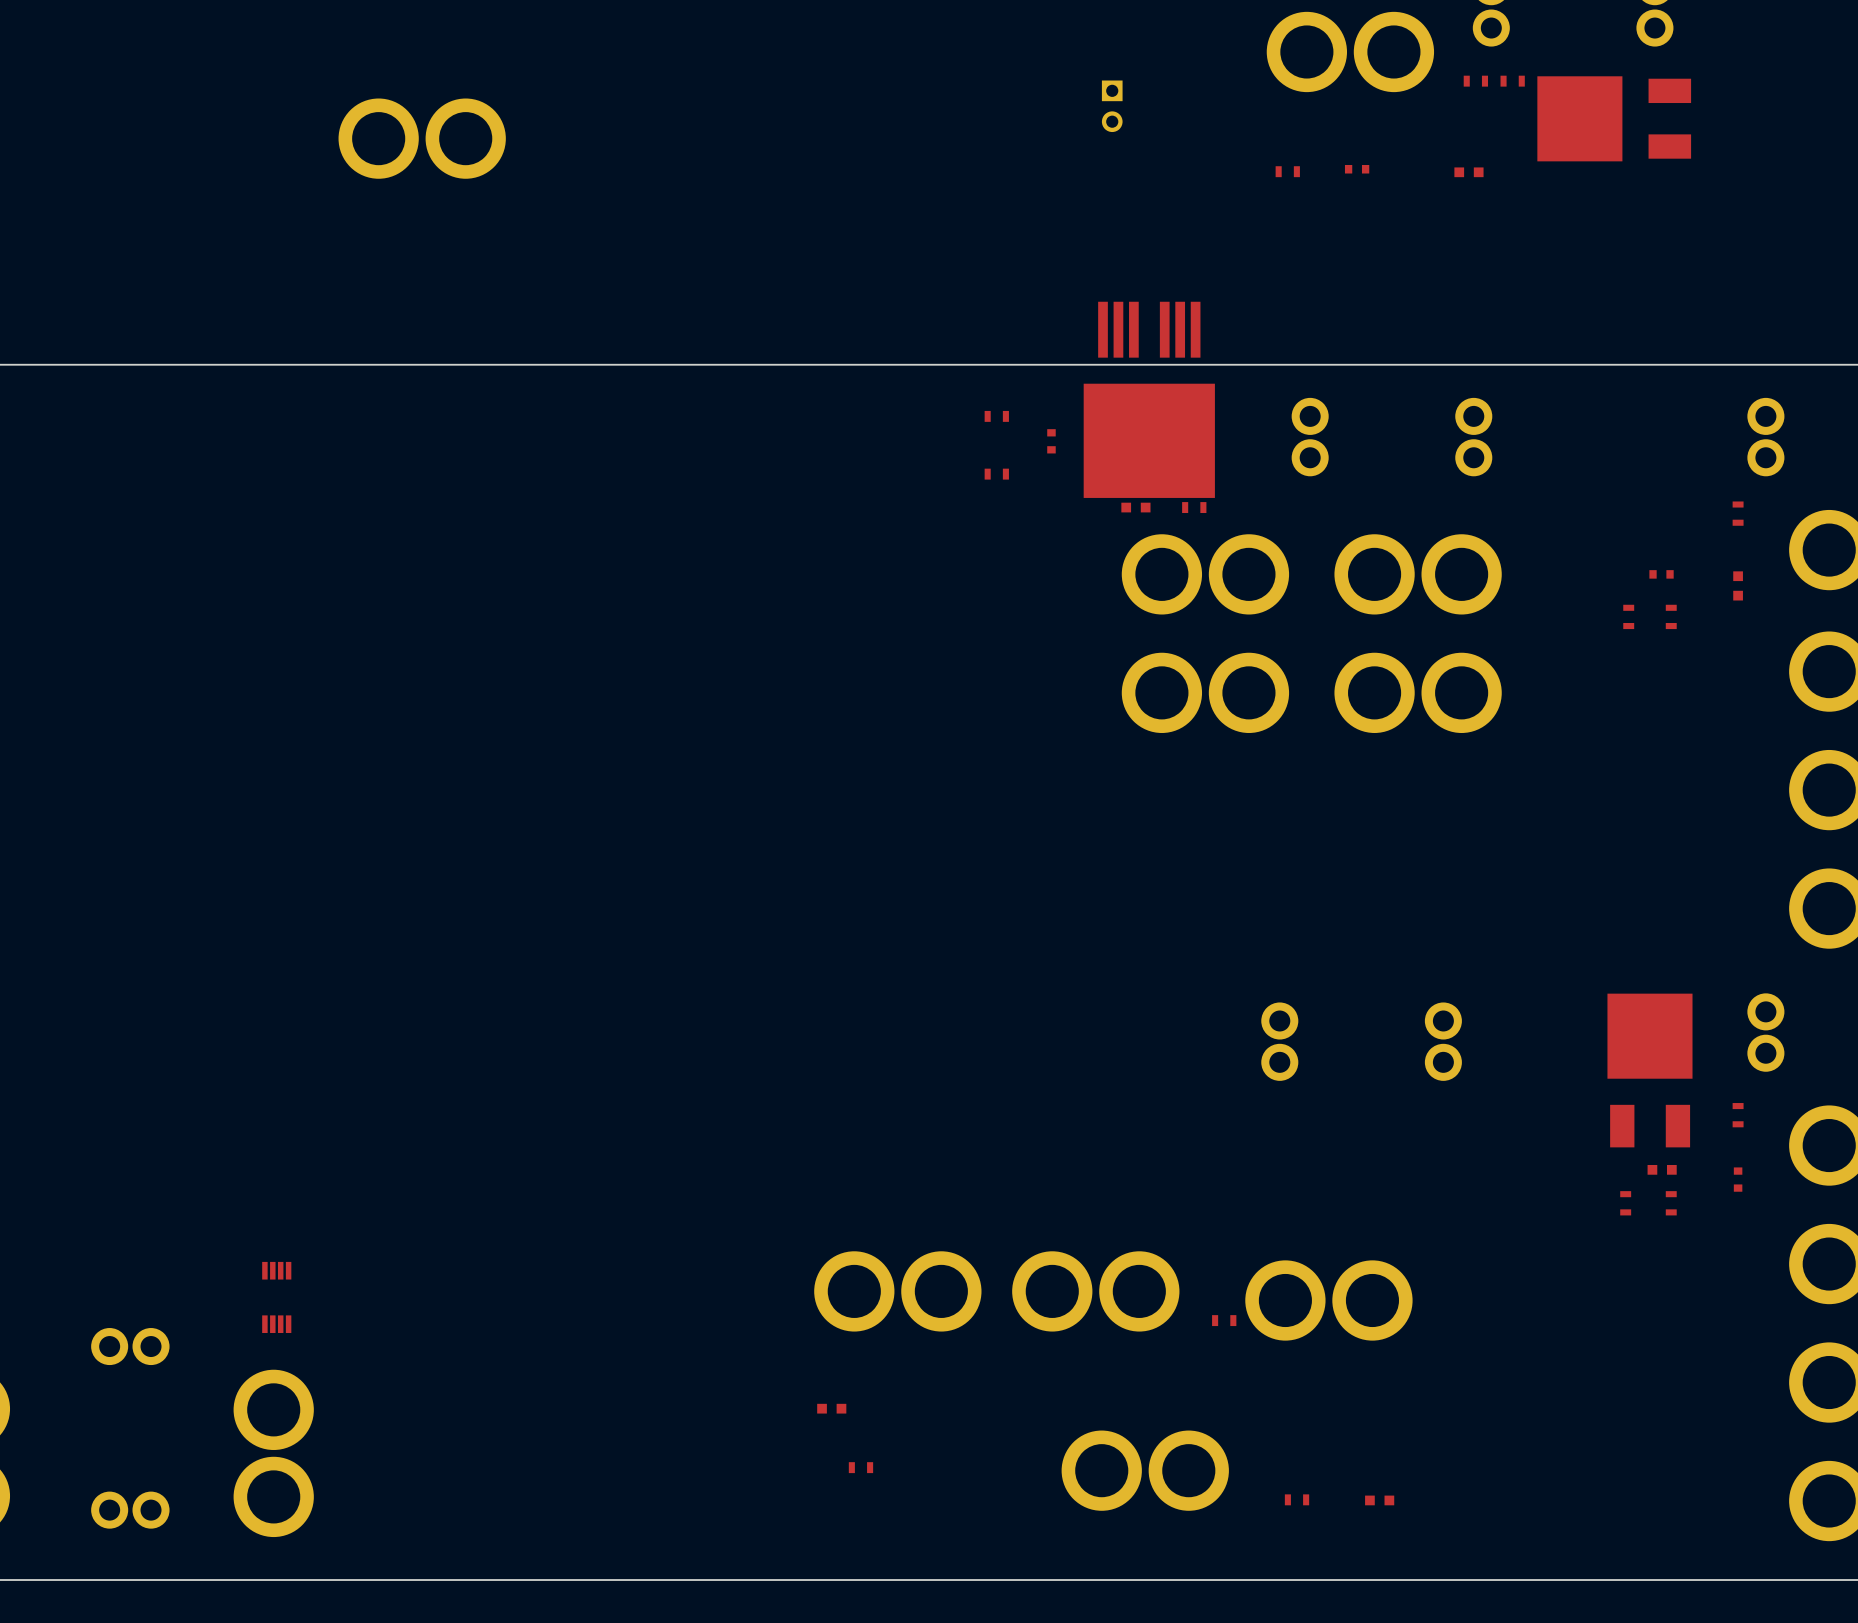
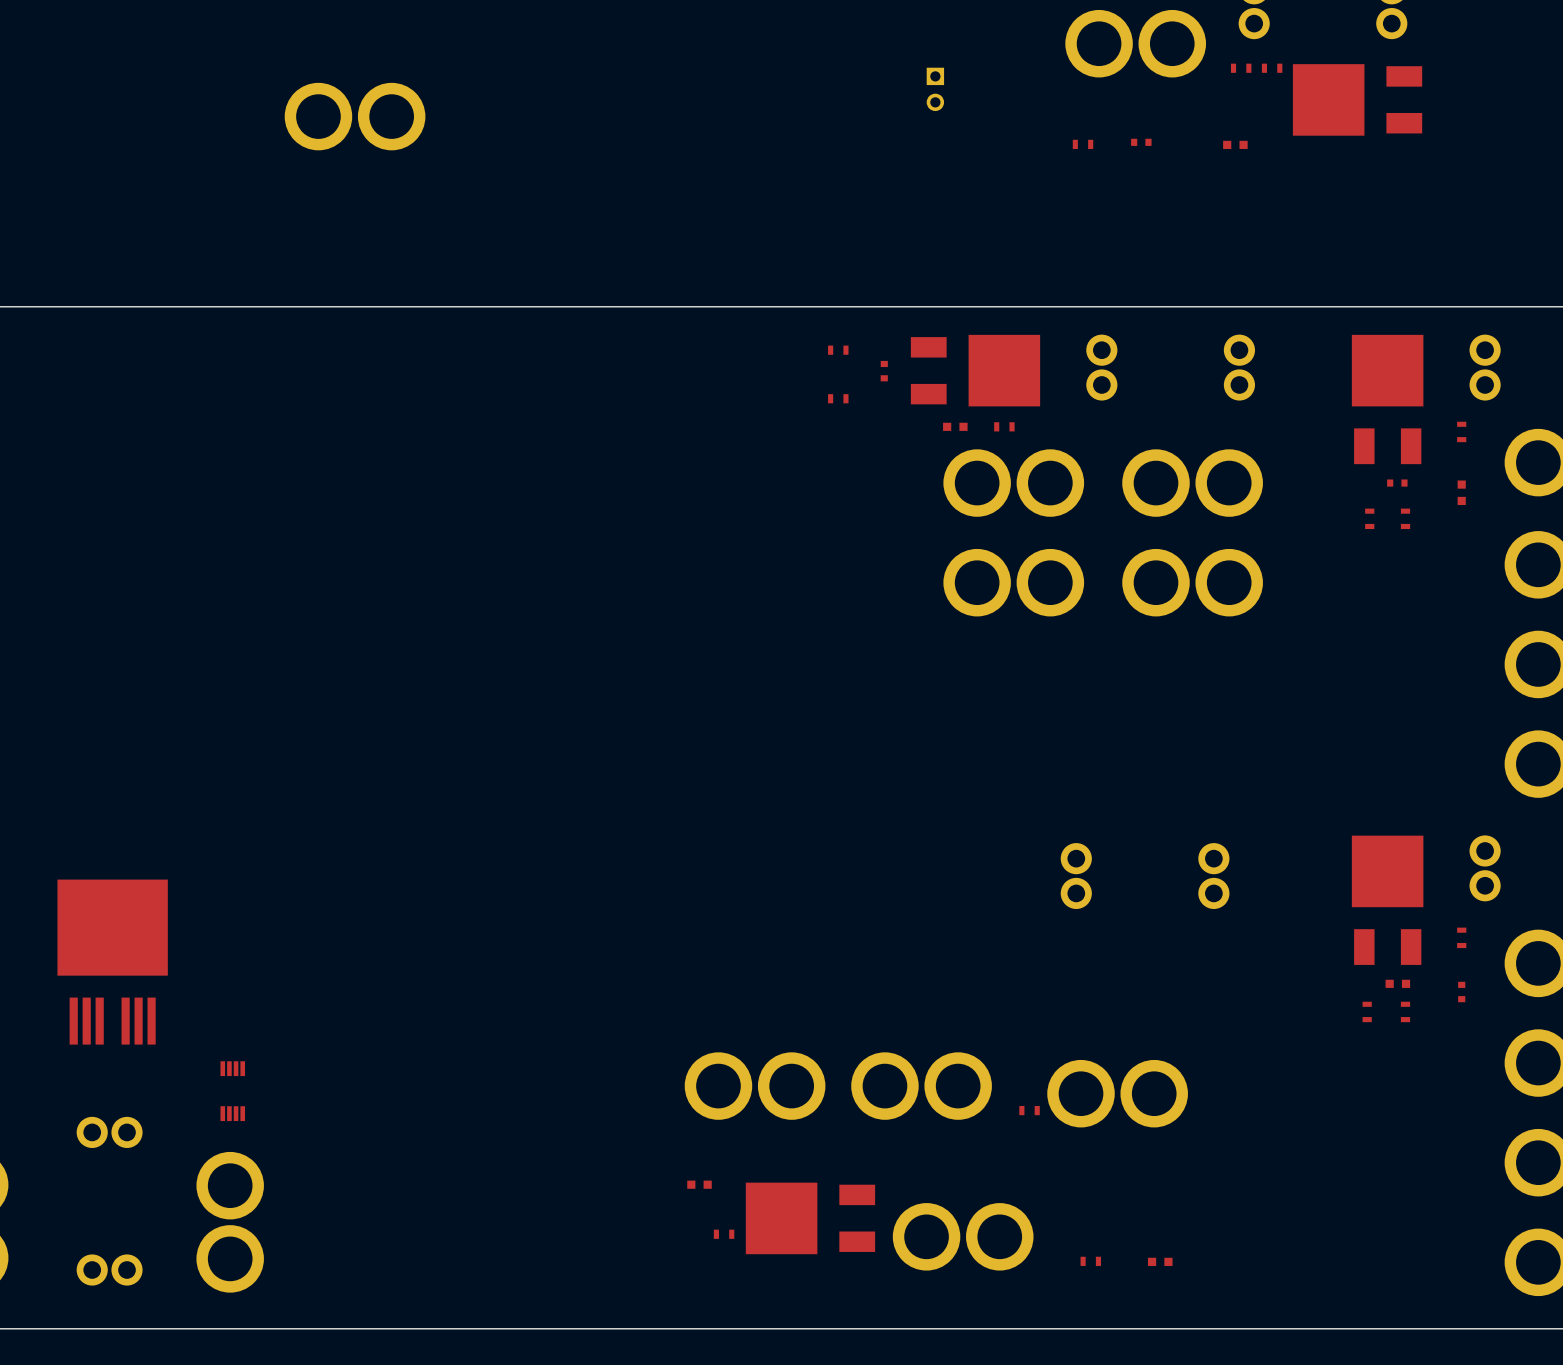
part: (1149, 399) -> none
part: none -> (975, 370)
part: none -> (1387, 399)
part: none -> (112, 962)
part: none -> (810, 1218)

